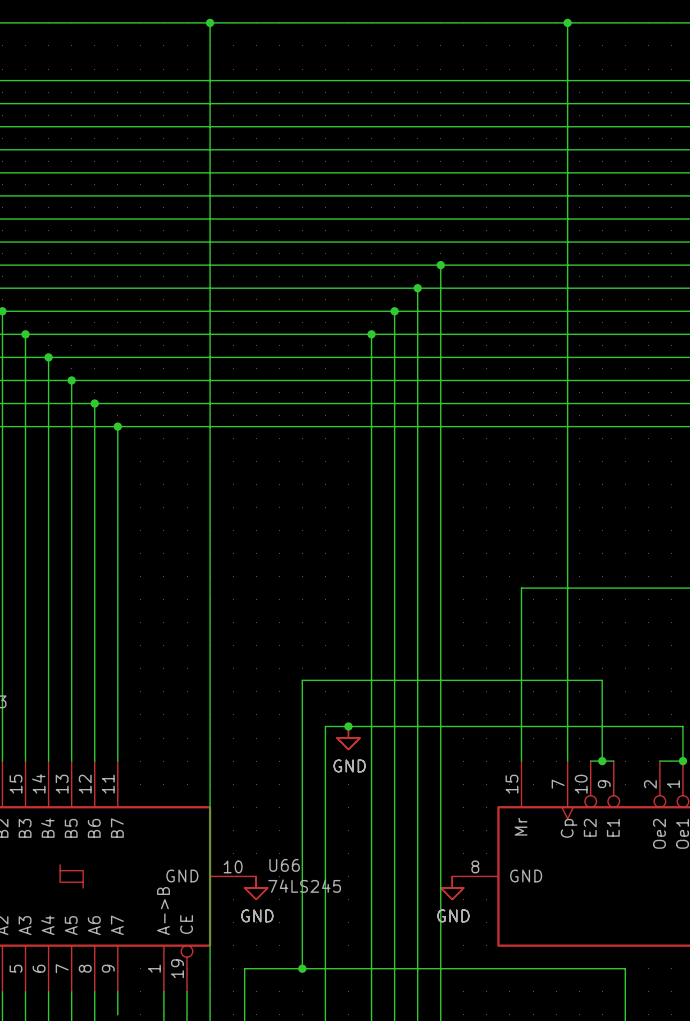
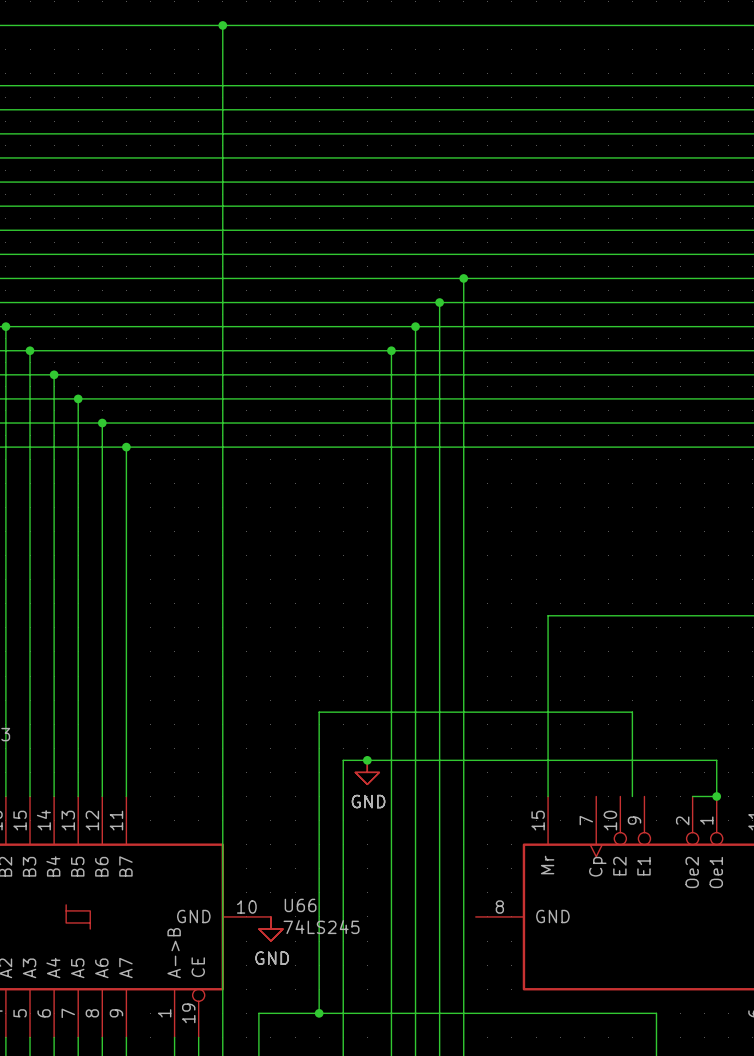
wire: (567, 22) (567, 761) -> none
junction: (567, 22) -> none
wire: (590, 761) (613, 761) -> none
junction: (602, 761) -> none
power symbol: GND (452, 887) -> none

